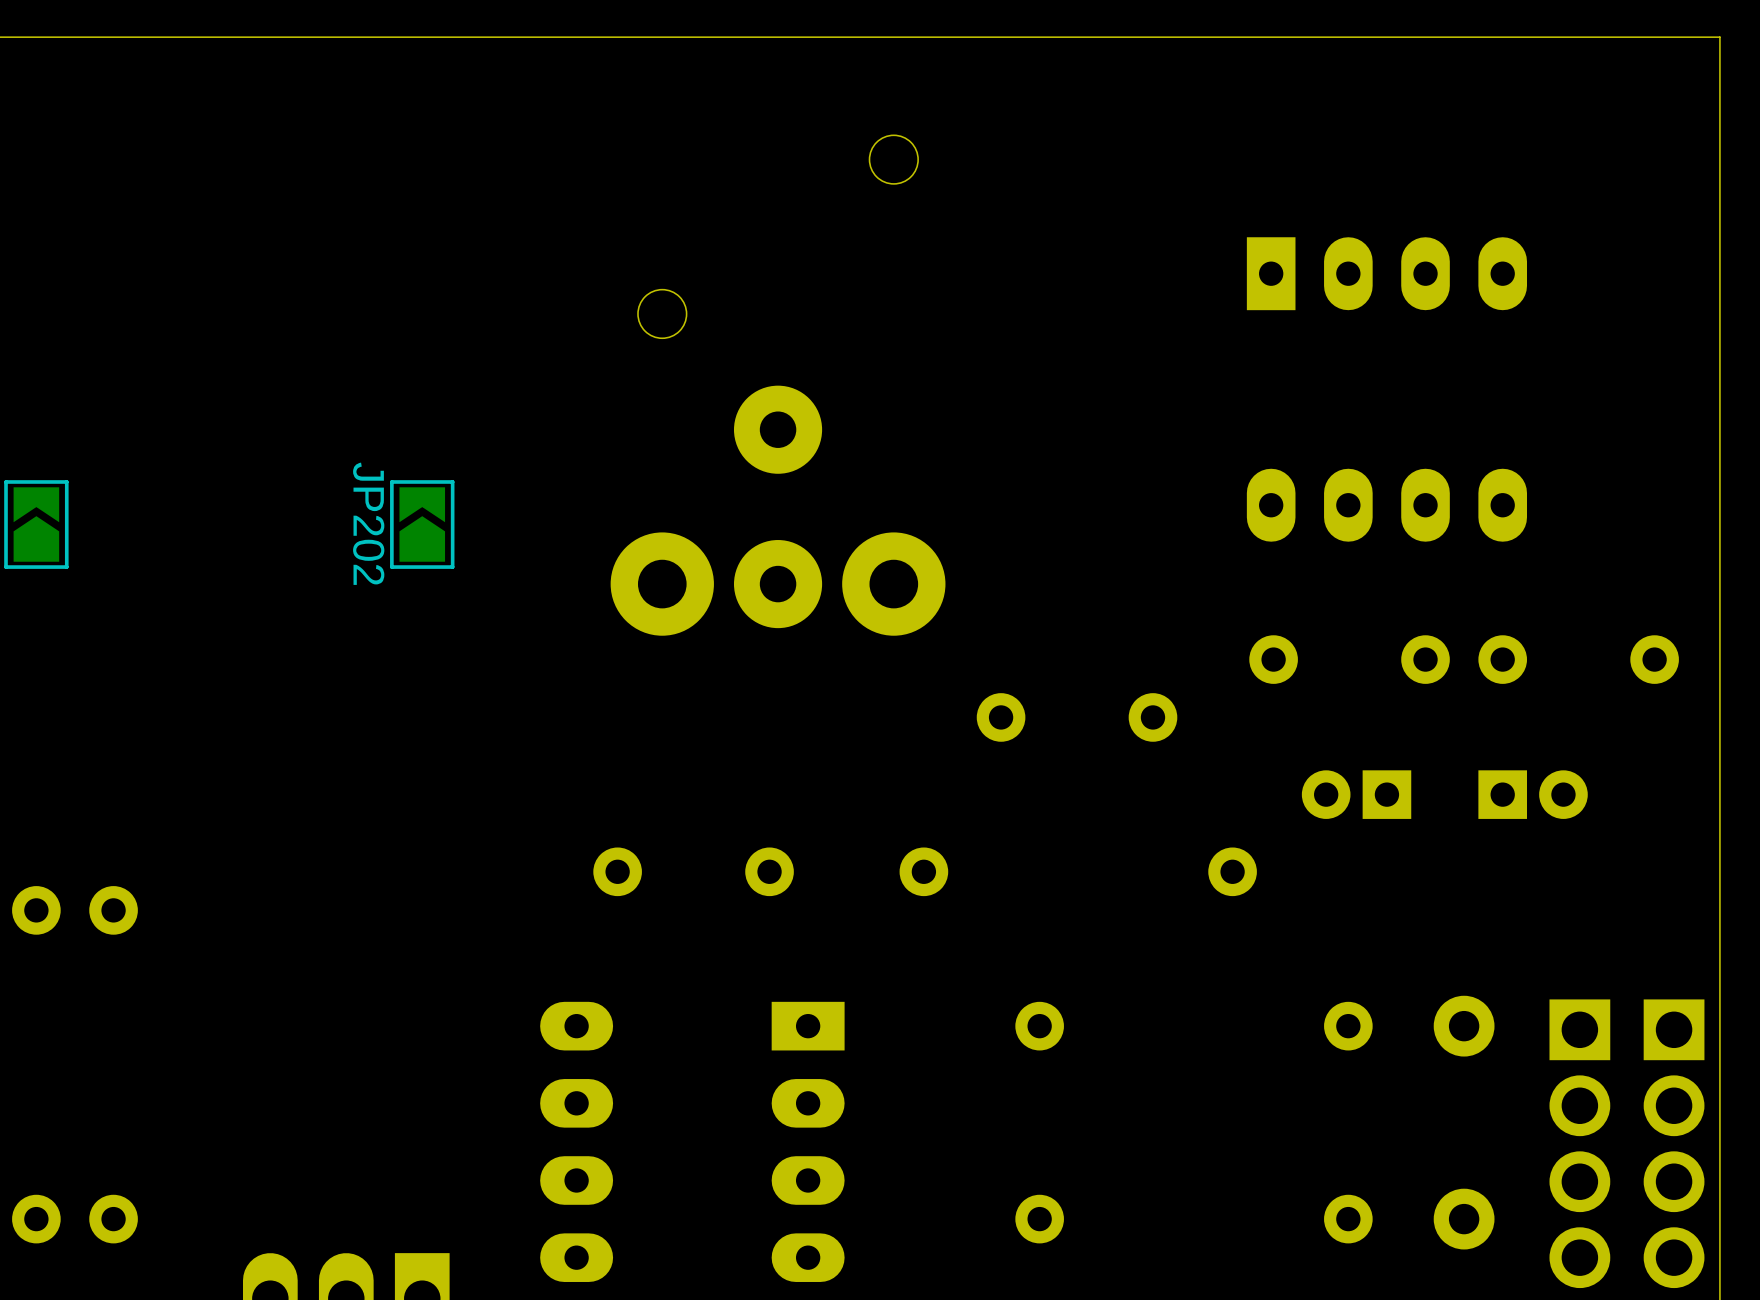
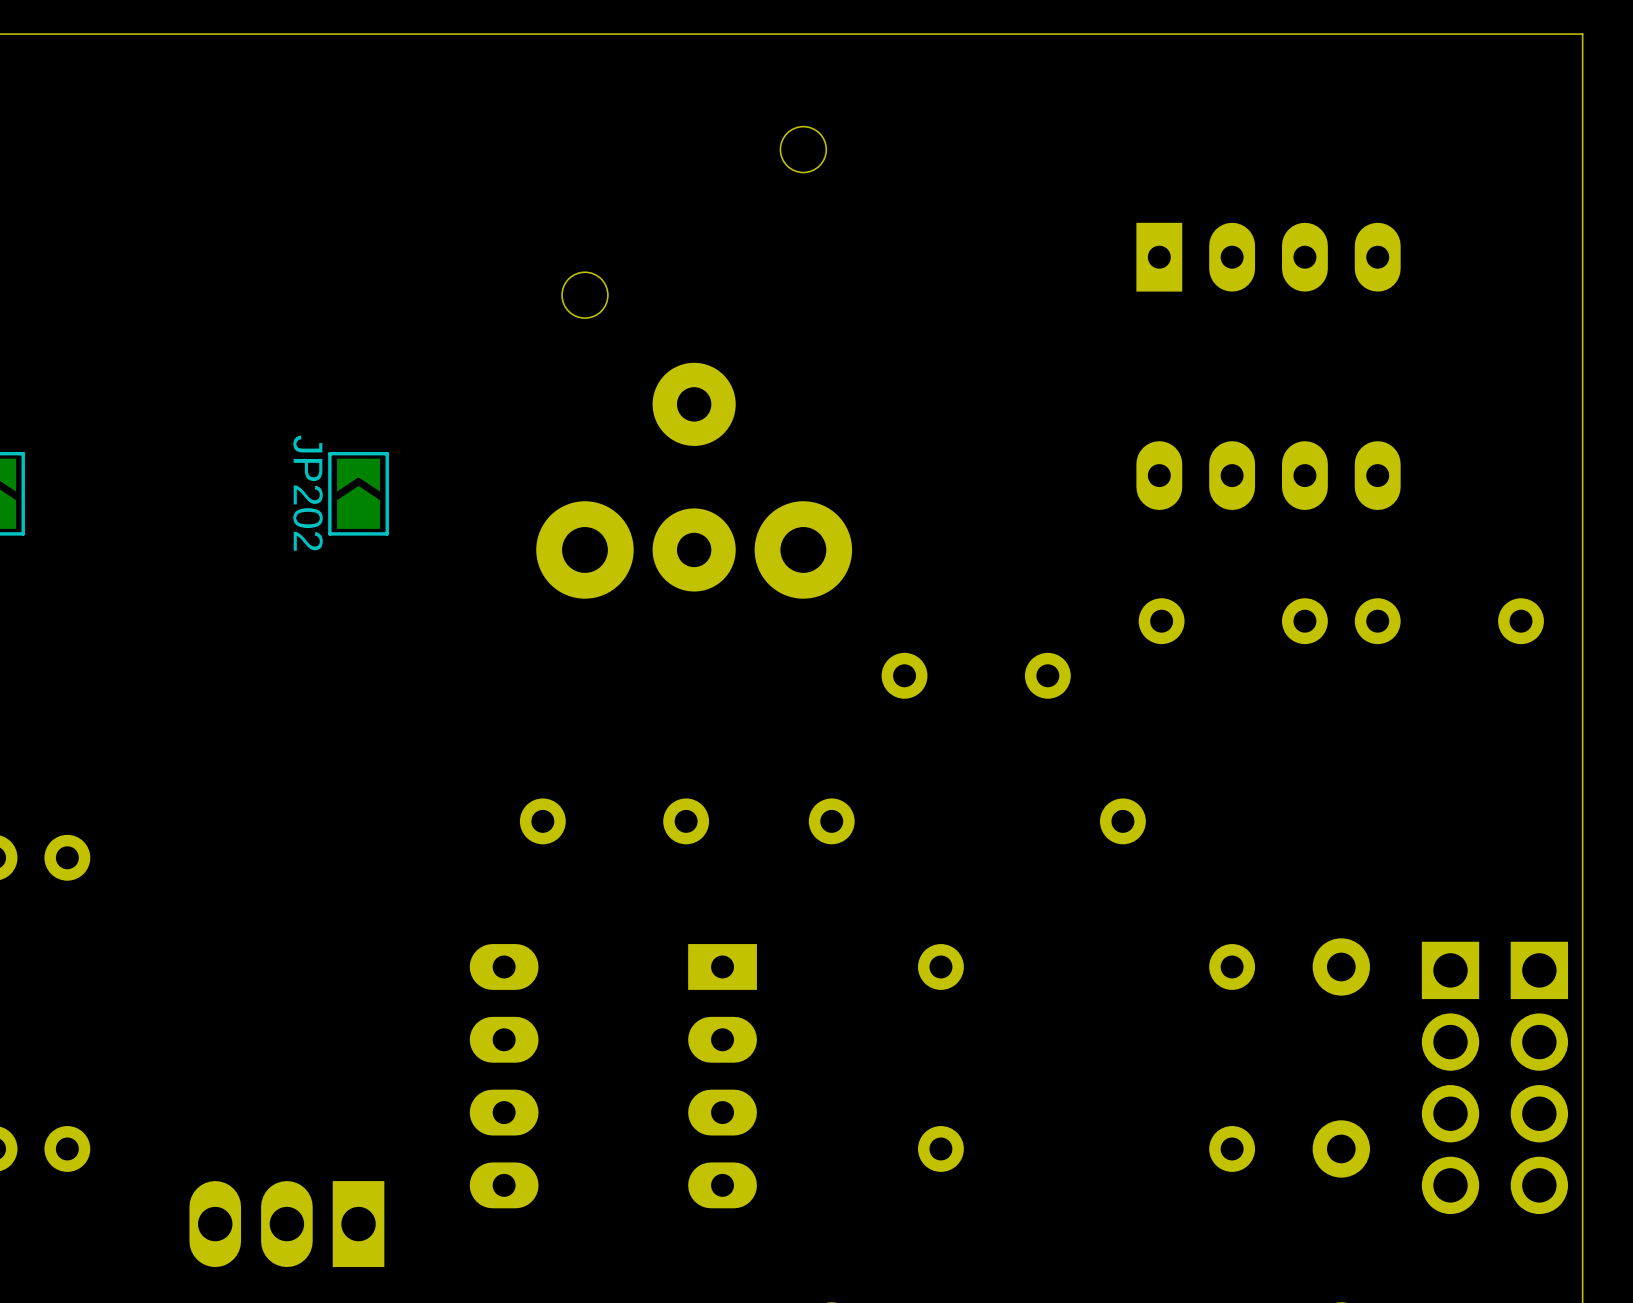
part: (1356, 794) -> none
part: (1533, 794) -> none

